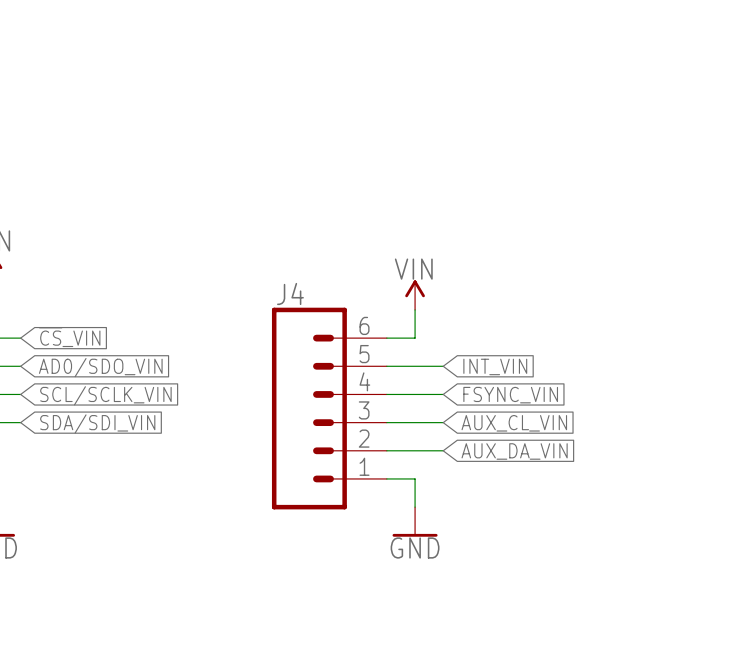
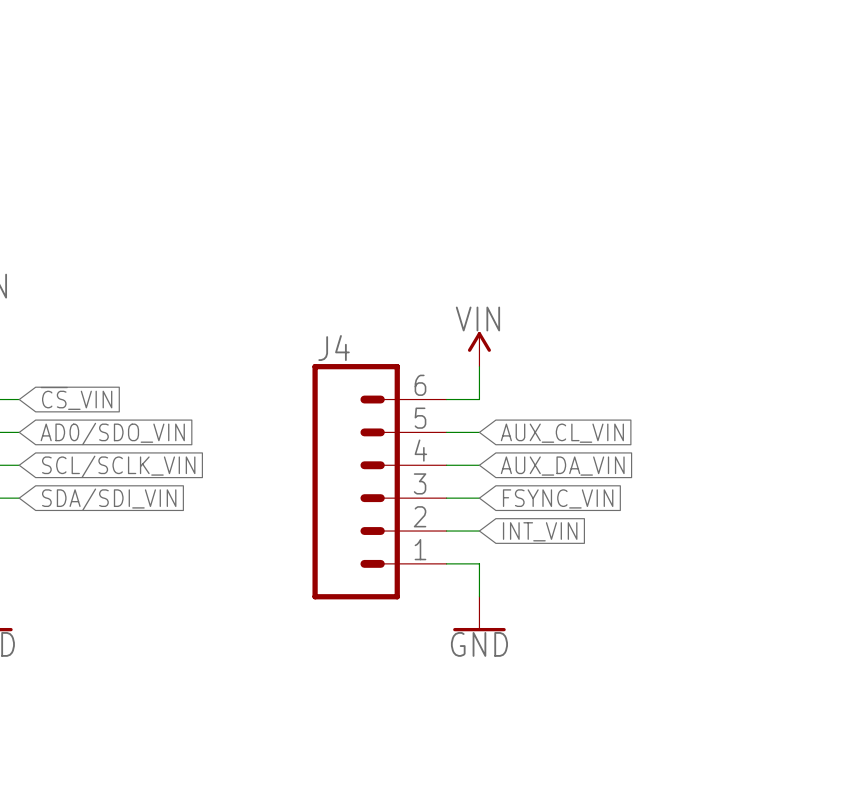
wire: (415, 366) (443, 366) -> none
global label position: INT_VIN (495, 366) -> INT_VIN (540, 531)
wire: (415, 394) (443, 394) -> none
global label position: FSYNC_VIN (510, 395) -> FSYNC_VIN (558, 498)
wire: (415, 422) (443, 422) -> none
global label position: AUX_CL_VIN (514, 423) -> AUX_CL_VIN (562, 433)
wire: (415, 450) (443, 450) -> none
global label position: AUX_DA_VIN (514, 451) -> AUX_DA_VIN (562, 466)

